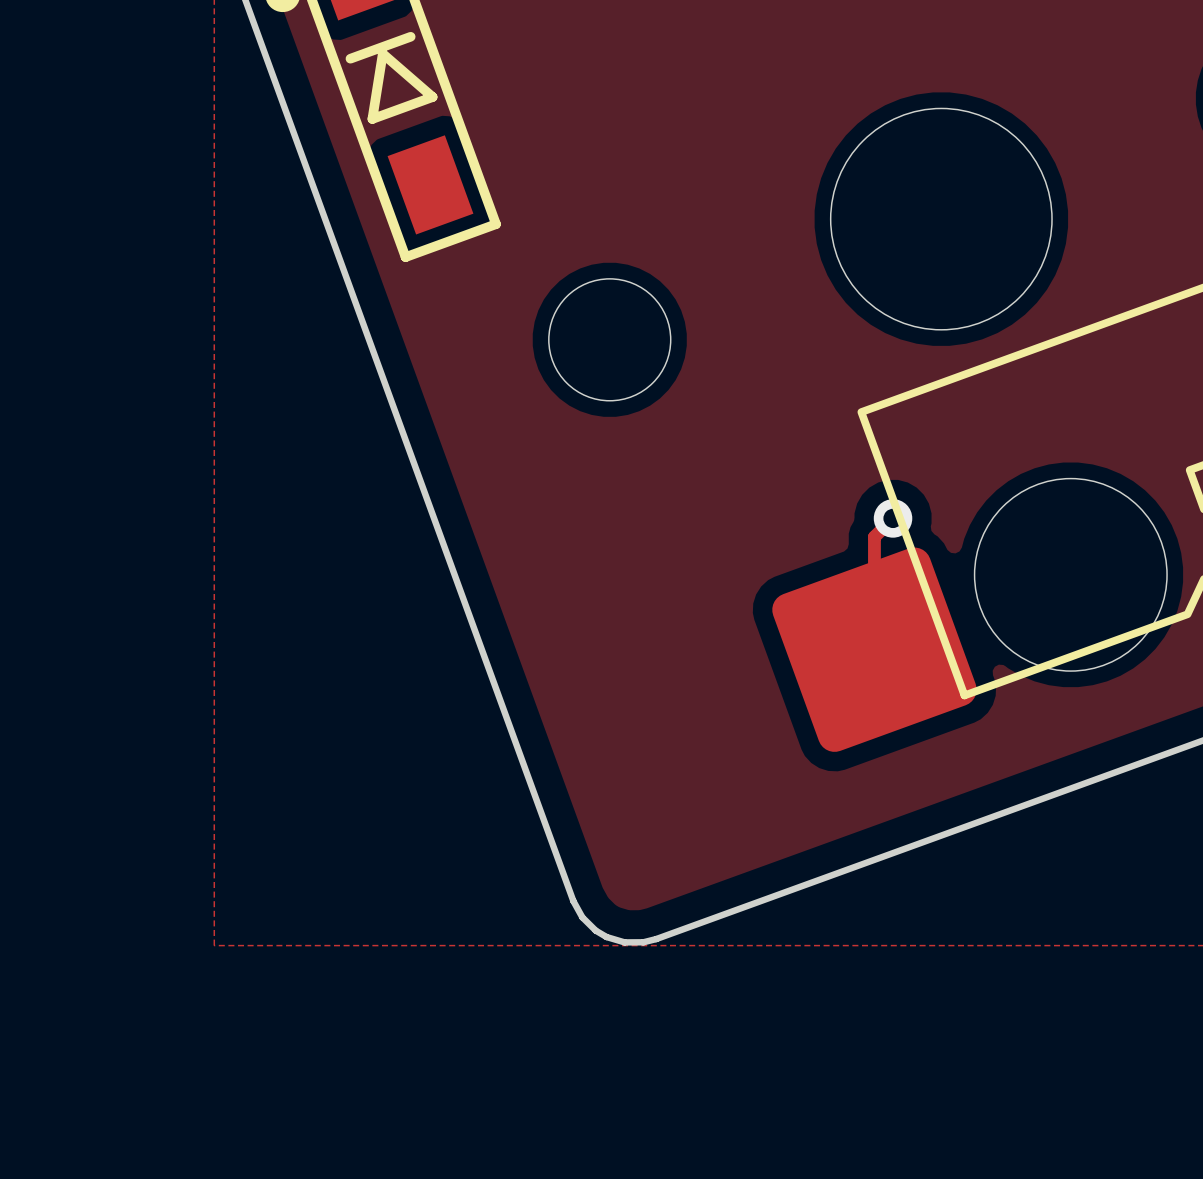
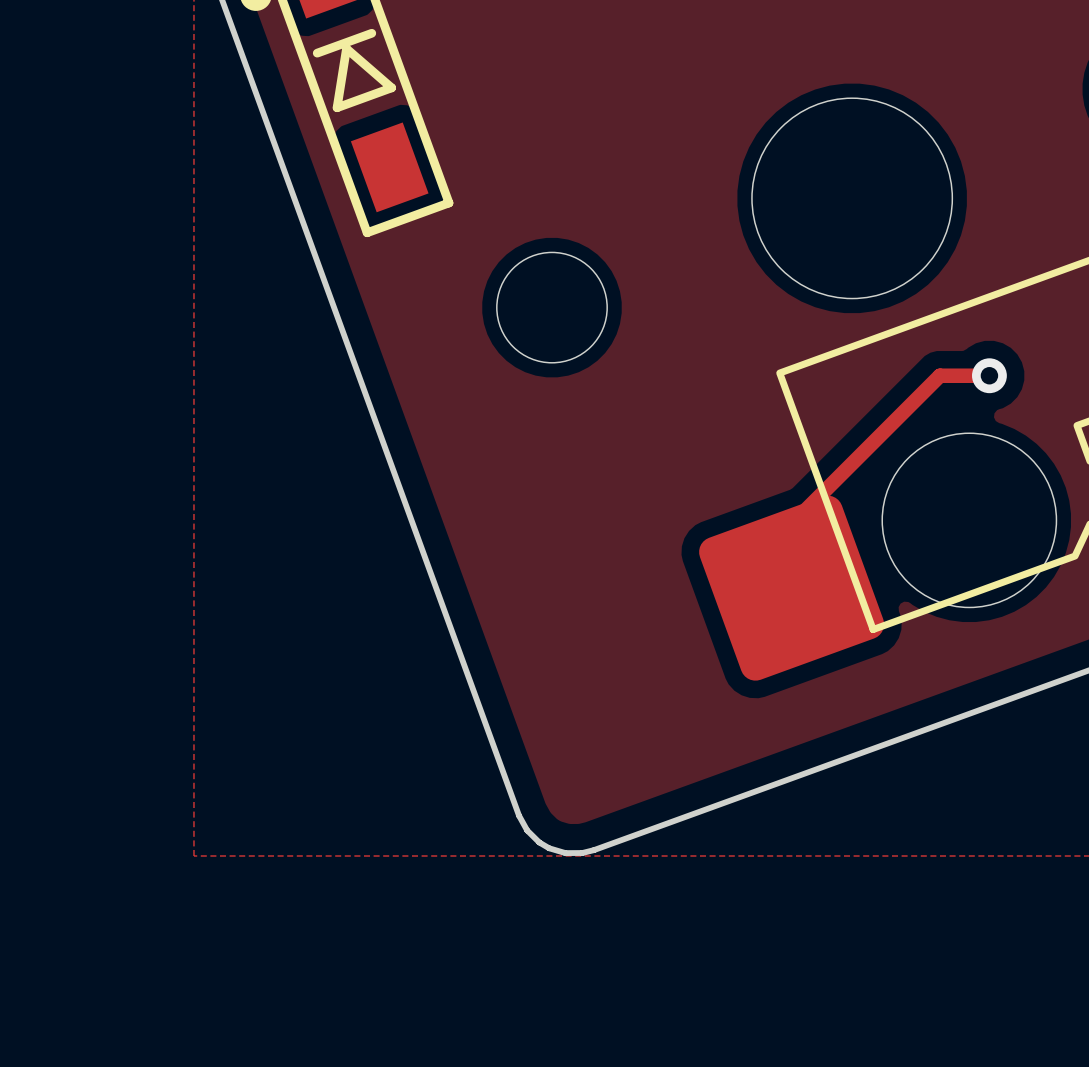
track: (893, 518) (874, 537) (874, 578) -> (989, 375) (939, 375) (791, 524)
via position: (893, 518) -> (989, 375)

